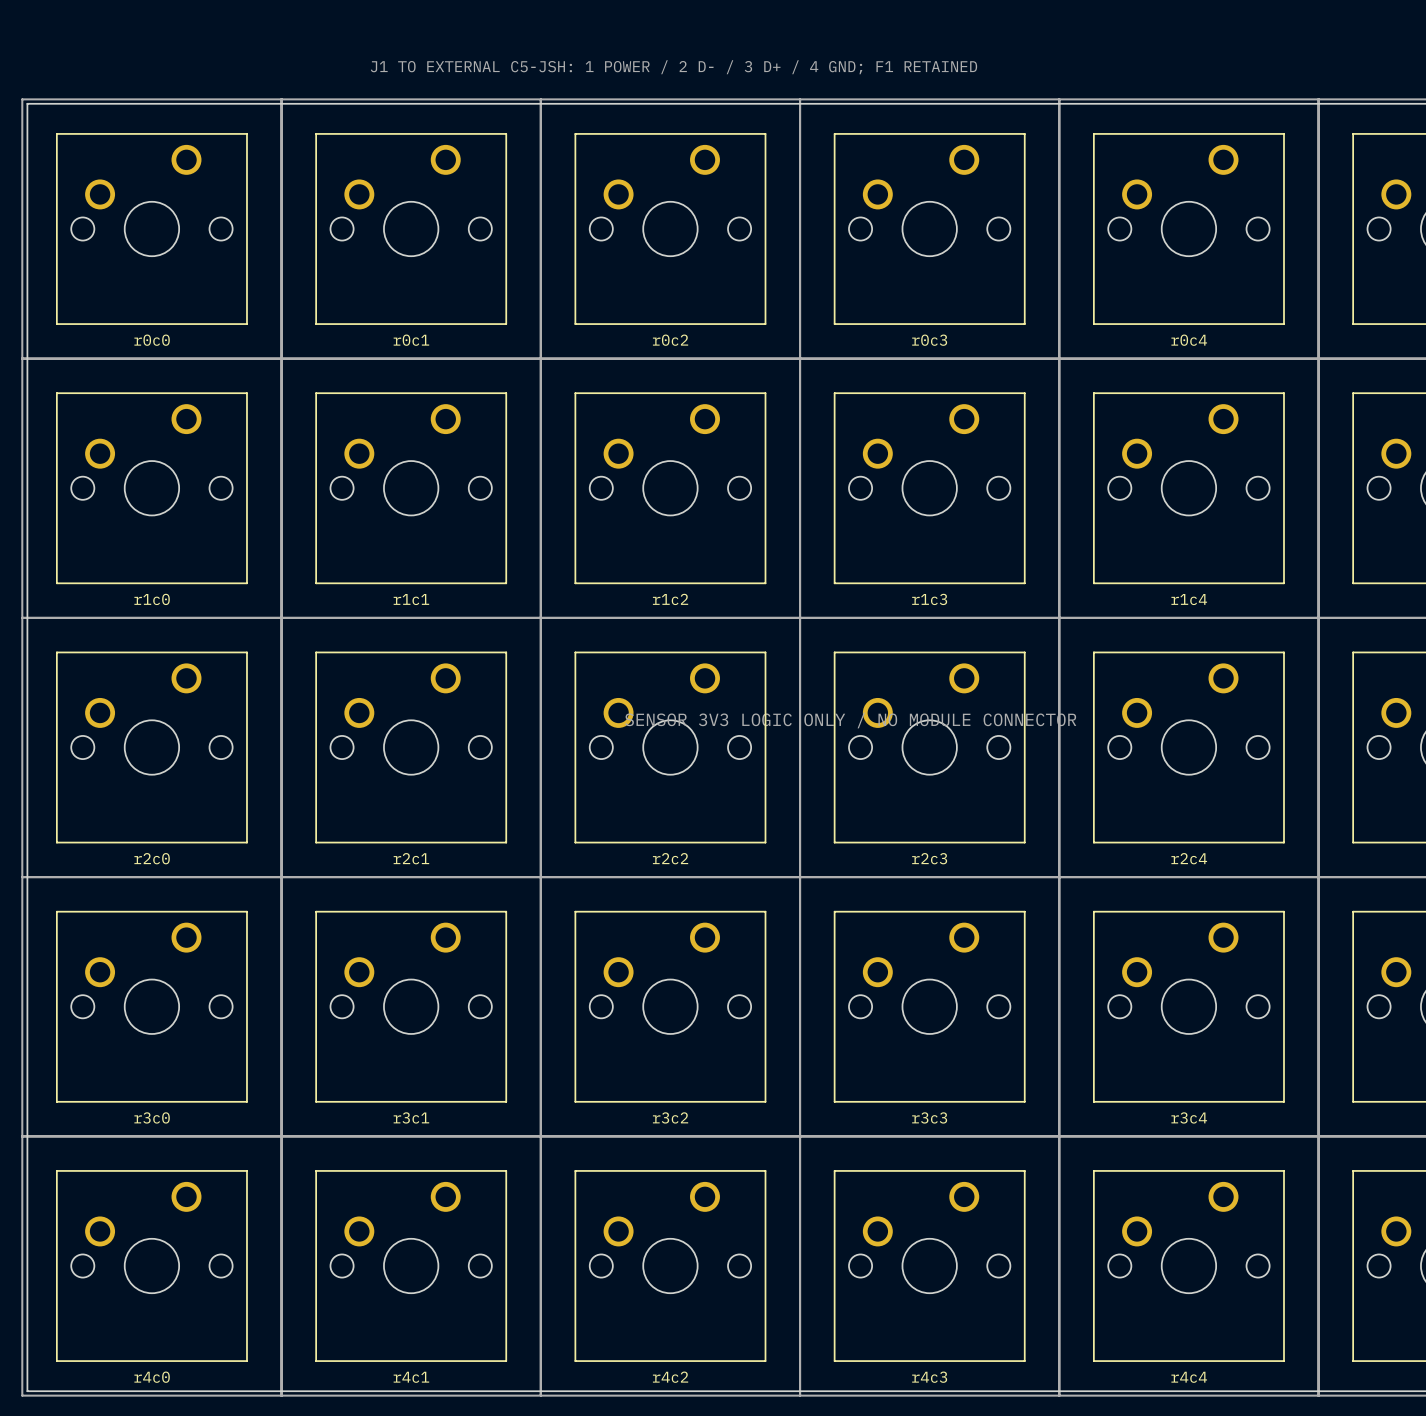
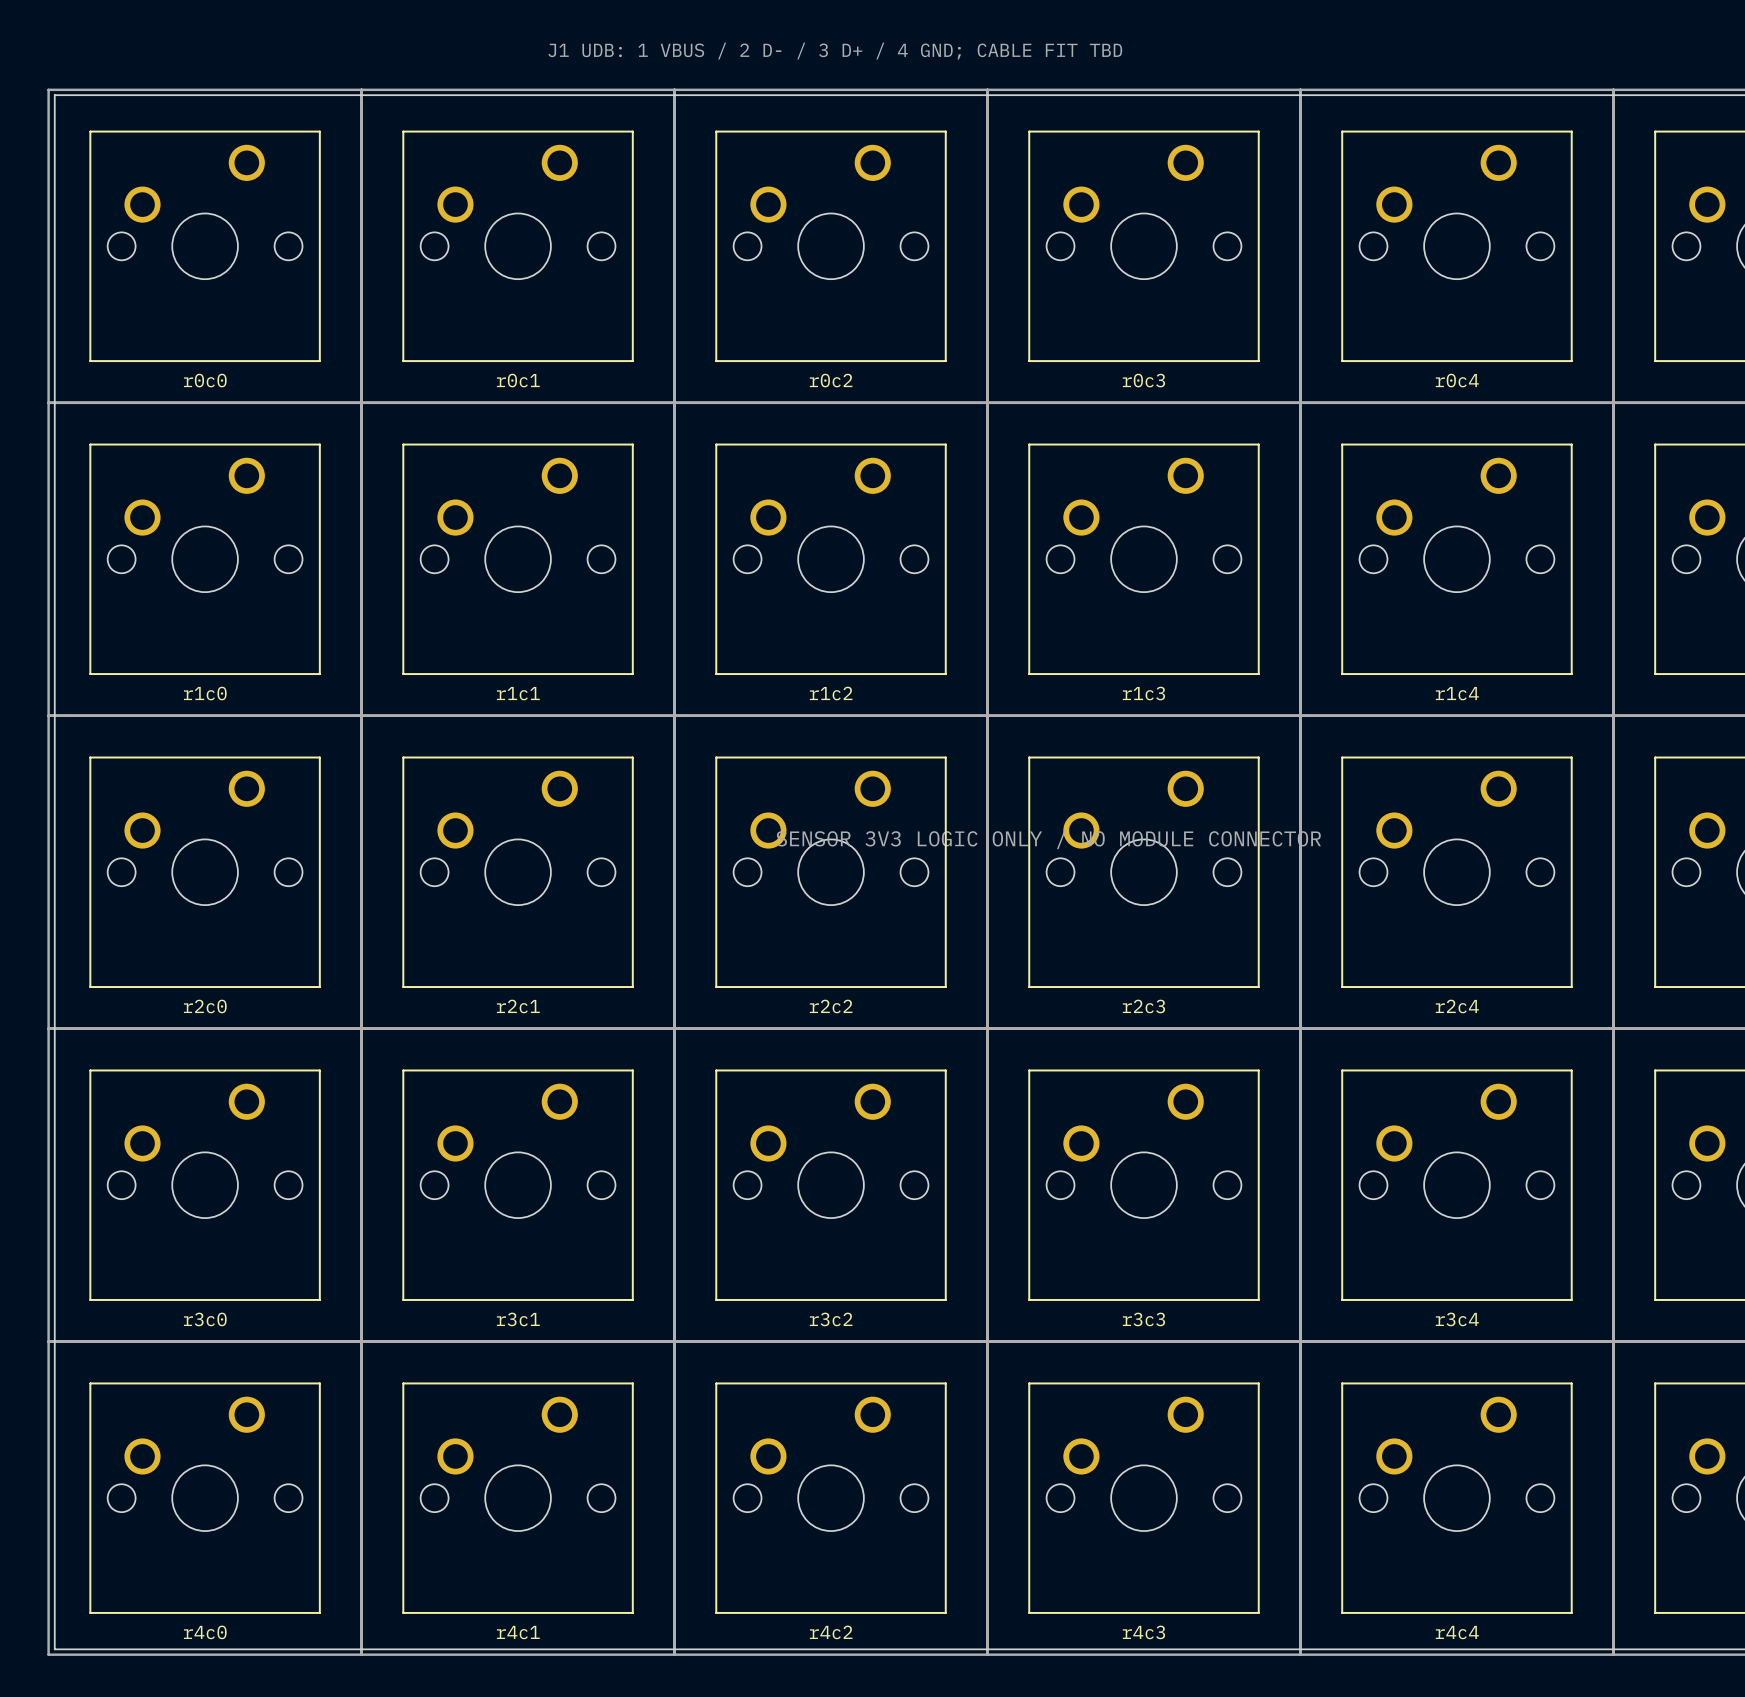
text: J1 TO EXTERNAL C5-JSH: 1 POWER / 2 D- / 3 D+ / 4 GND; F1 RETAINED (673, 67) -> J1 UDB: 1 VBUS / 2 D- / 3 D+ / 4 GND; CABLE FIT TBD (835, 51)

